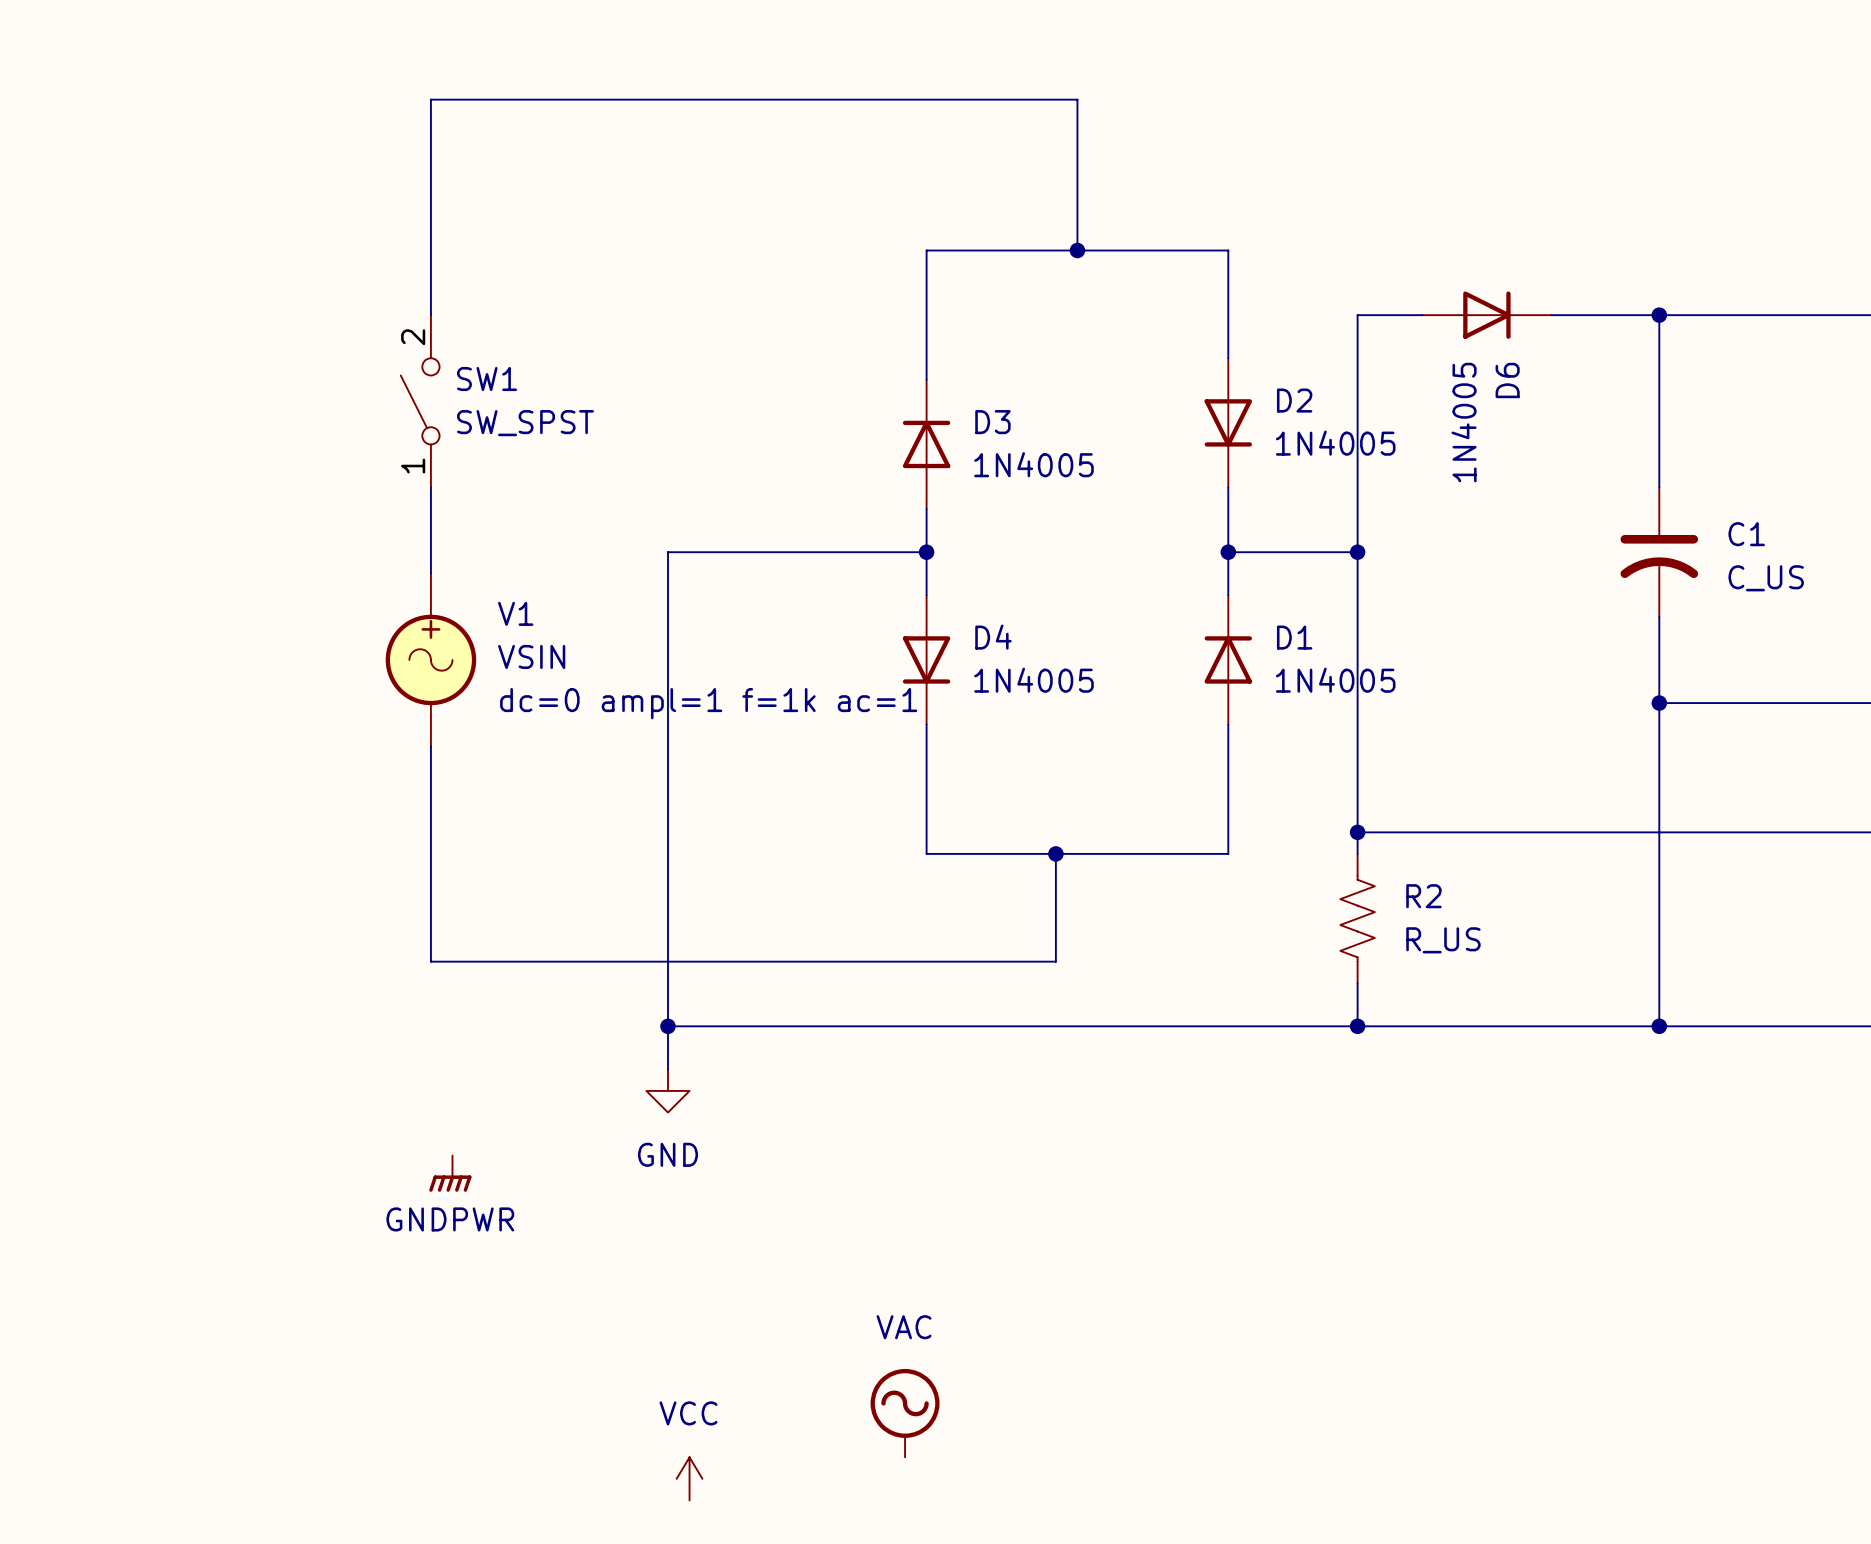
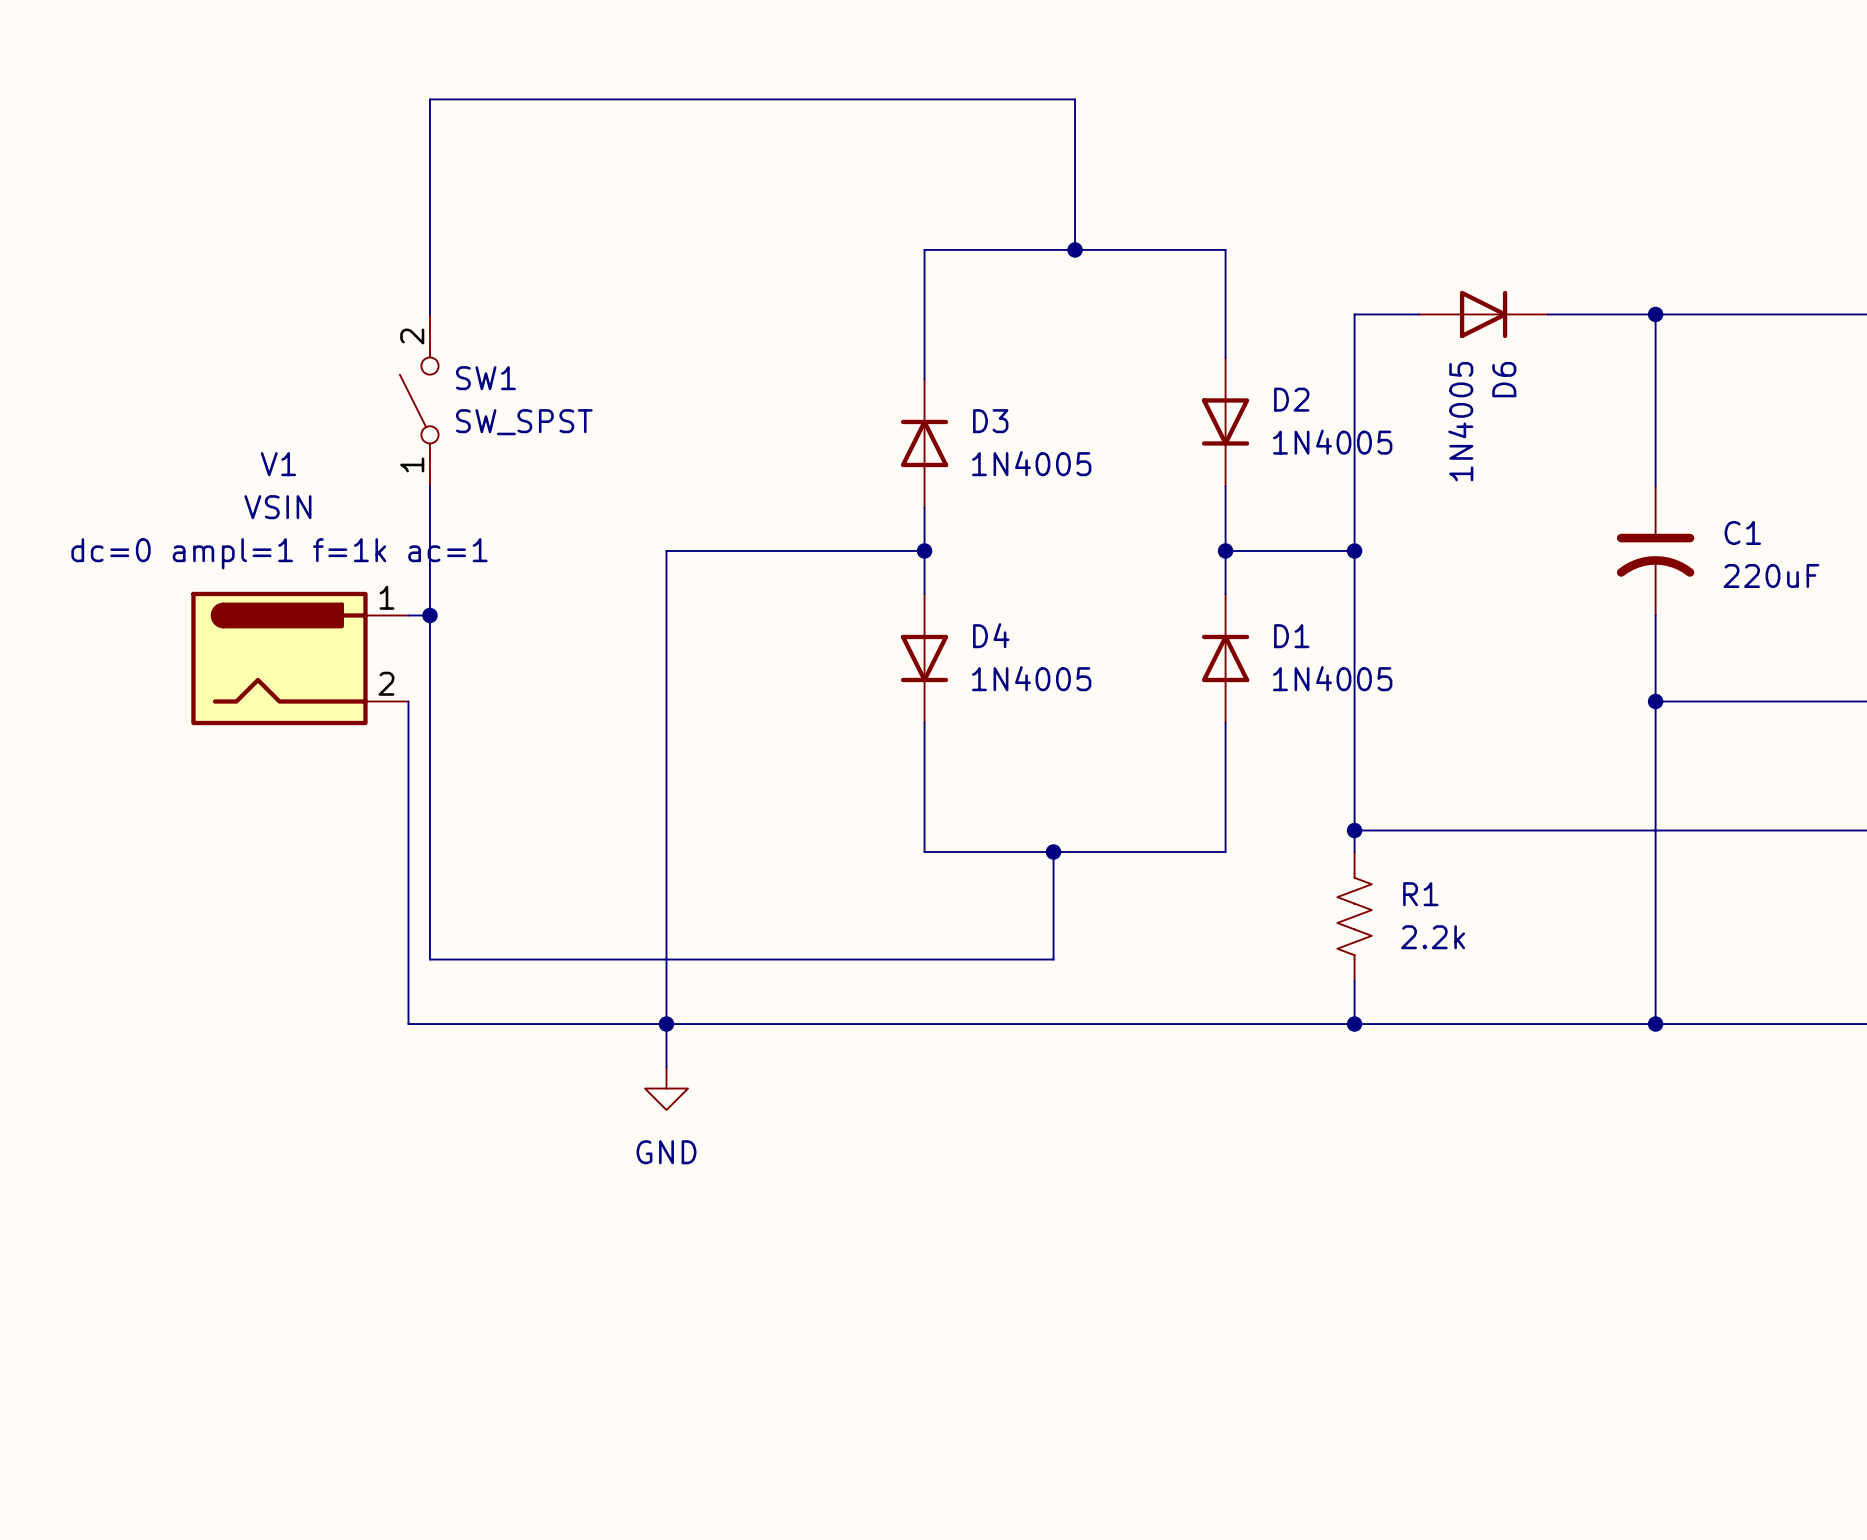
V1 symbol: [385, 573, 477, 747] -> [191, 591, 409, 726]
C1 value: C_US (1766, 578) -> 220uF (1771, 575)
V1 name position: V1 (515, 613) -> V1 (278, 464)
junction: none -> (429, 615)
V1 value position: VSIN (531, 656) -> VSIN (277, 507)
wire: none -> (408, 701) (408, 1024) (666, 1024)
V1 text position: dc=0 ampl=1 f=1k ac=1 (708, 703) -> dc=0 ampl=1 f=1k ac=1 (279, 553)
R2 name: R2 (1423, 896) -> R1 (1420, 894)
R2 value: R_US (1443, 940) -> 2.2k (1433, 937)
power symbol: GNDPWR (450, 1173) -> none
power symbol: VAC (905, 1413) -> none
power symbol: VCC (689, 1478) -> none

